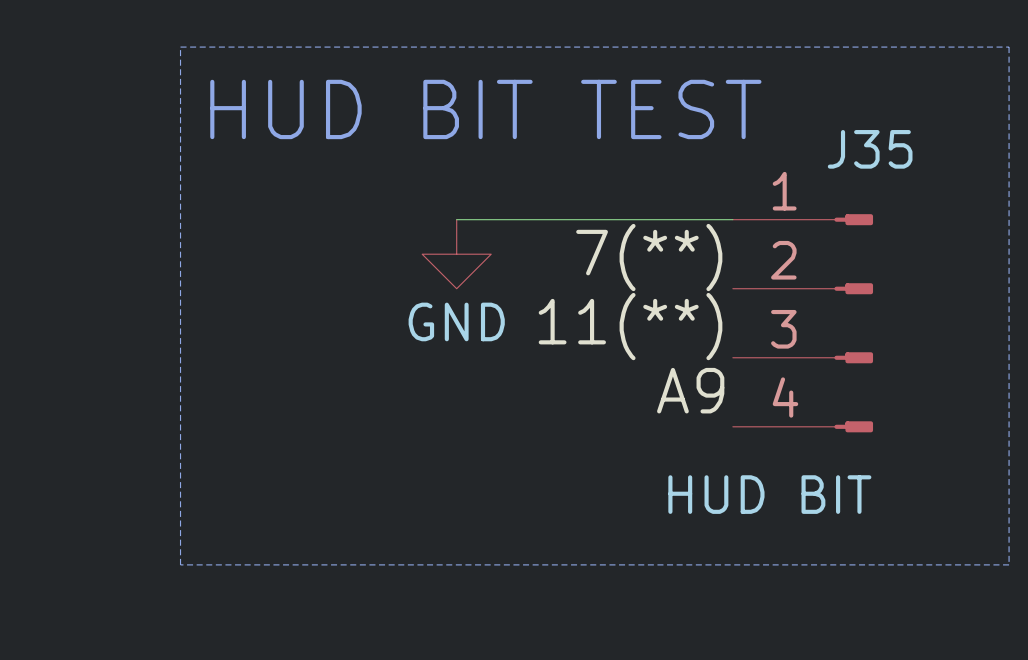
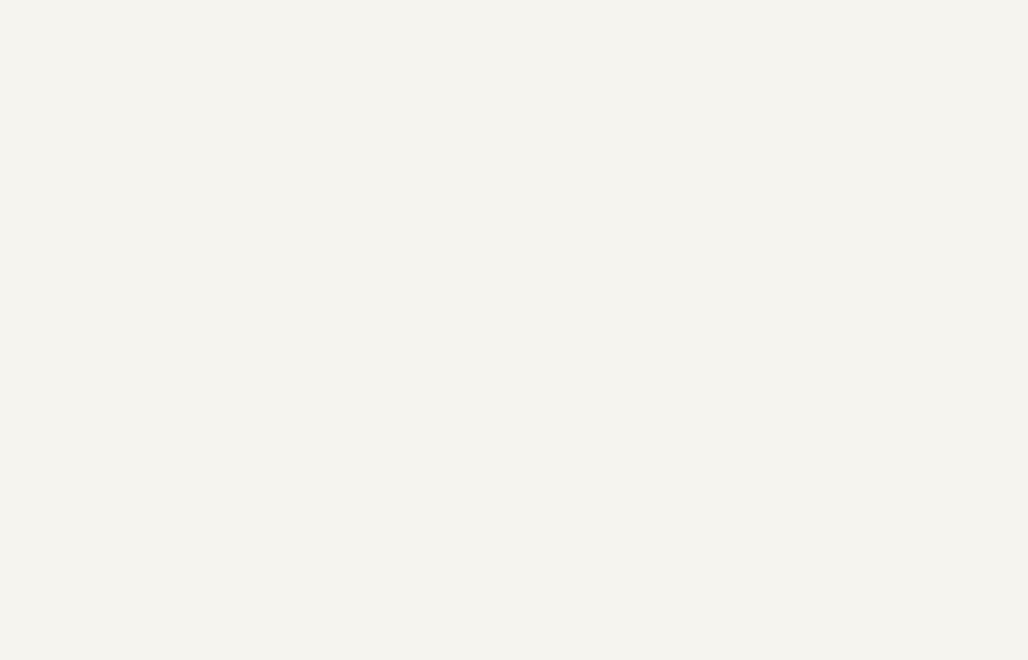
line: (180, 47) (180, 564) (1009, 564) (1009, 47) (180, 47) -> none
text: HUD BIT TEST (485, 109) -> none
wire: (456, 219) (732, 219) -> none
power symbol: GND (456, 254) -> none
label: 7(**) (649, 257) -> none
J35: HUD BIT (802, 323) -> none
label: 11(**) (630, 326) -> none
label: A9 (690, 390) -> none

